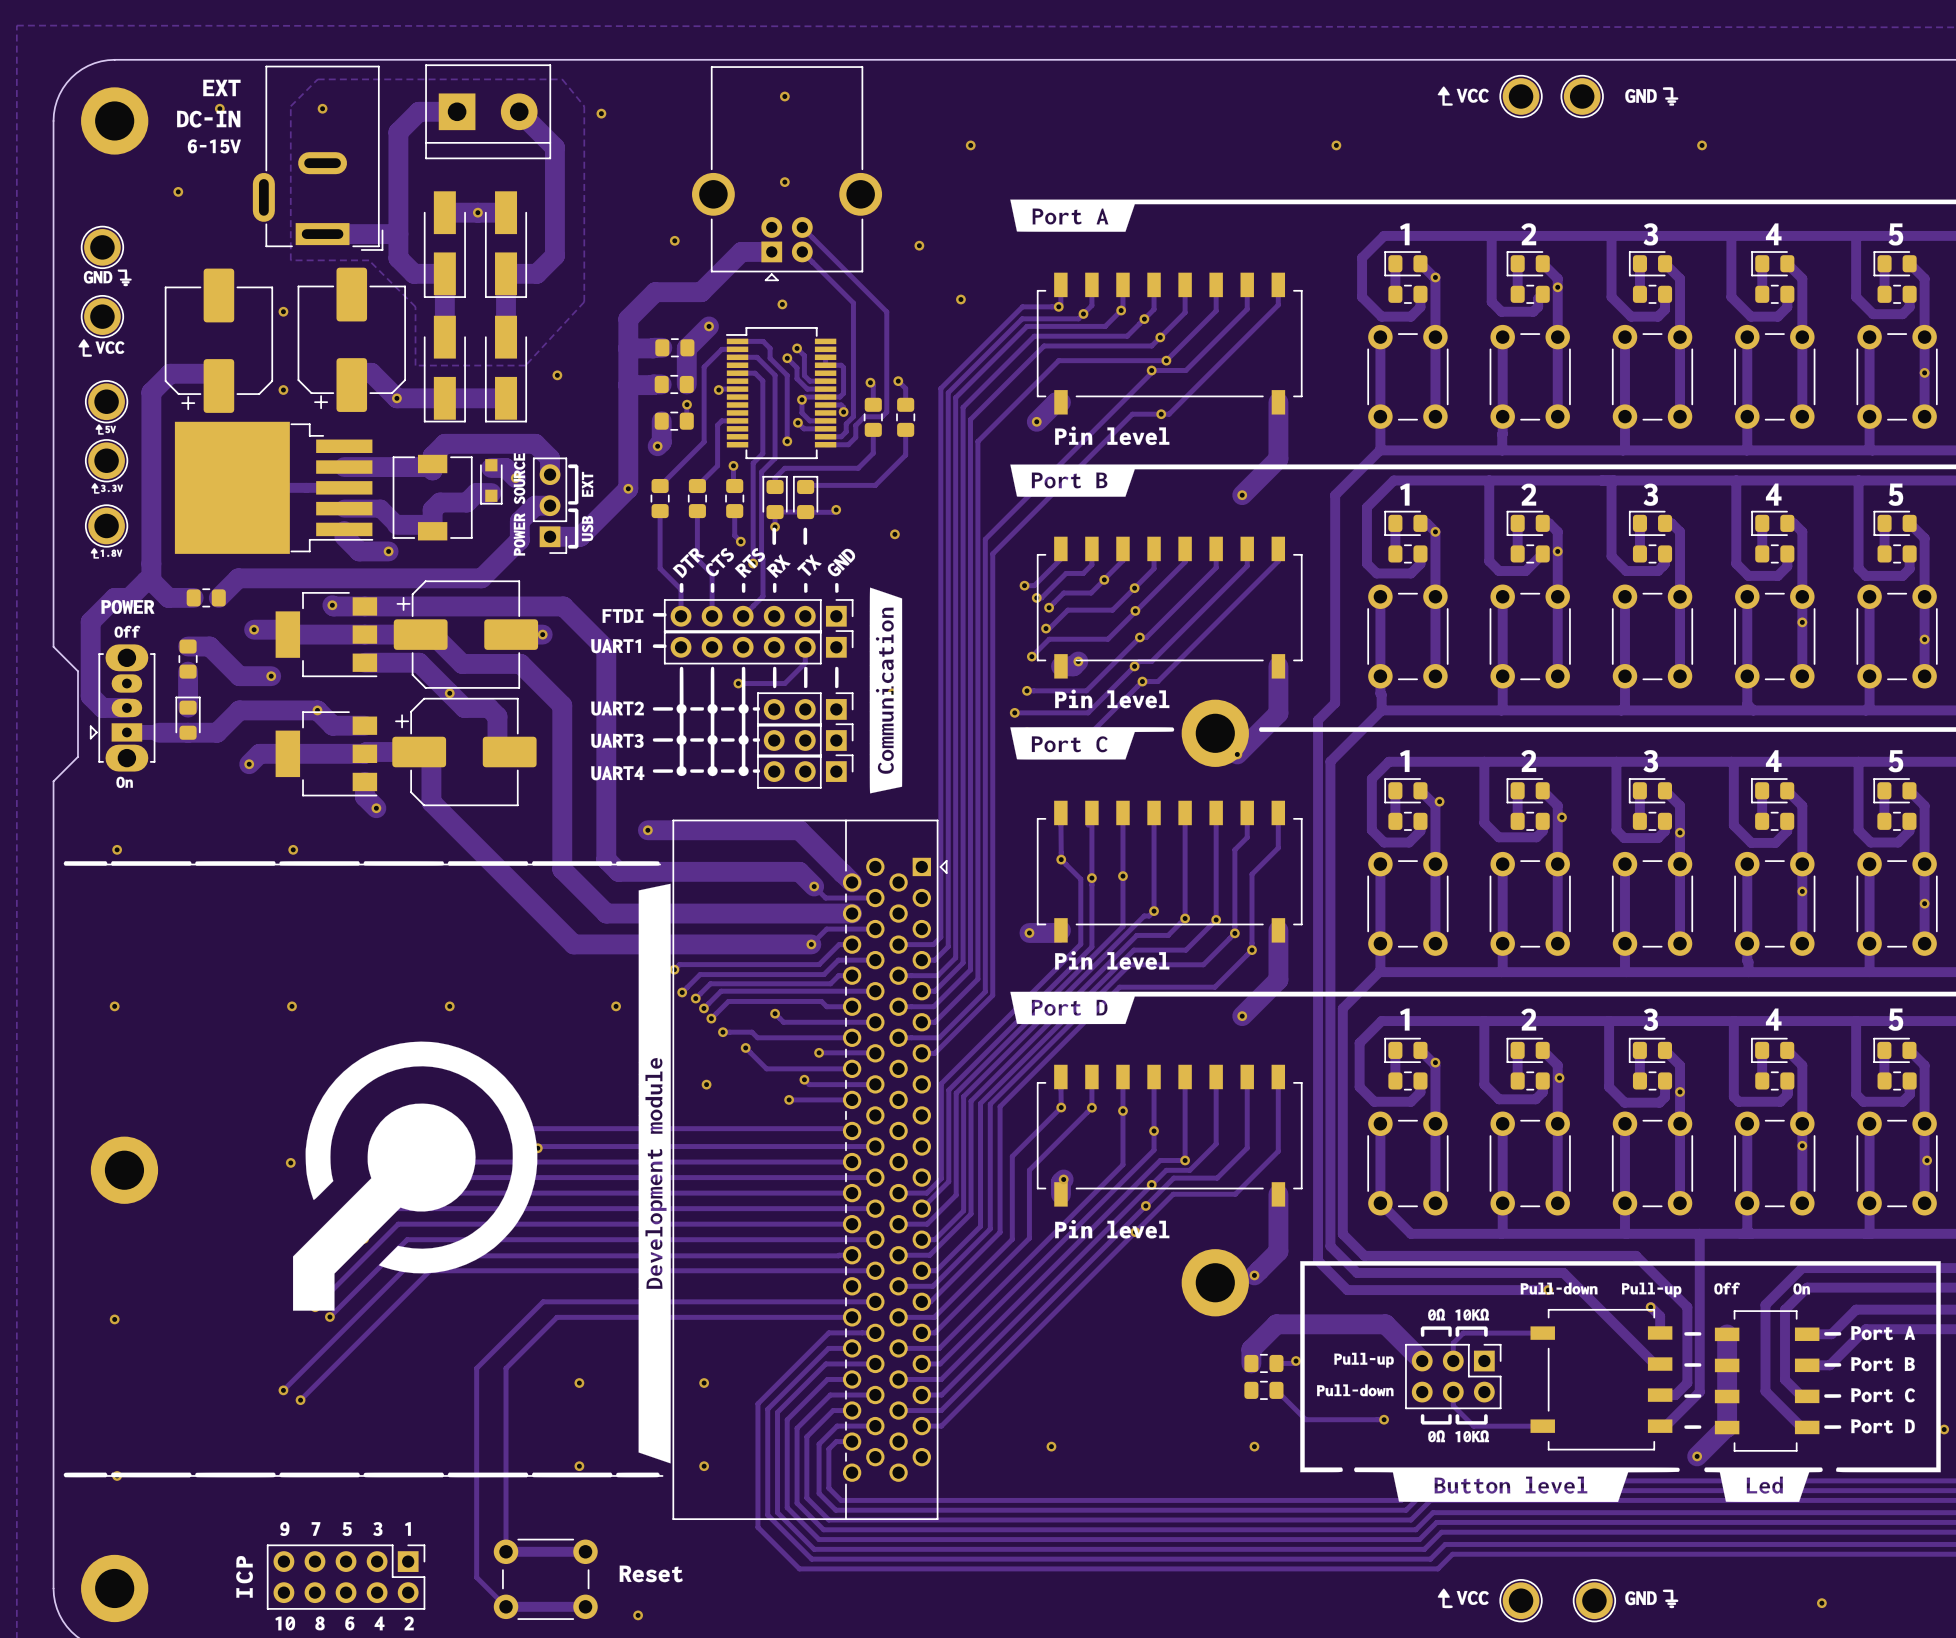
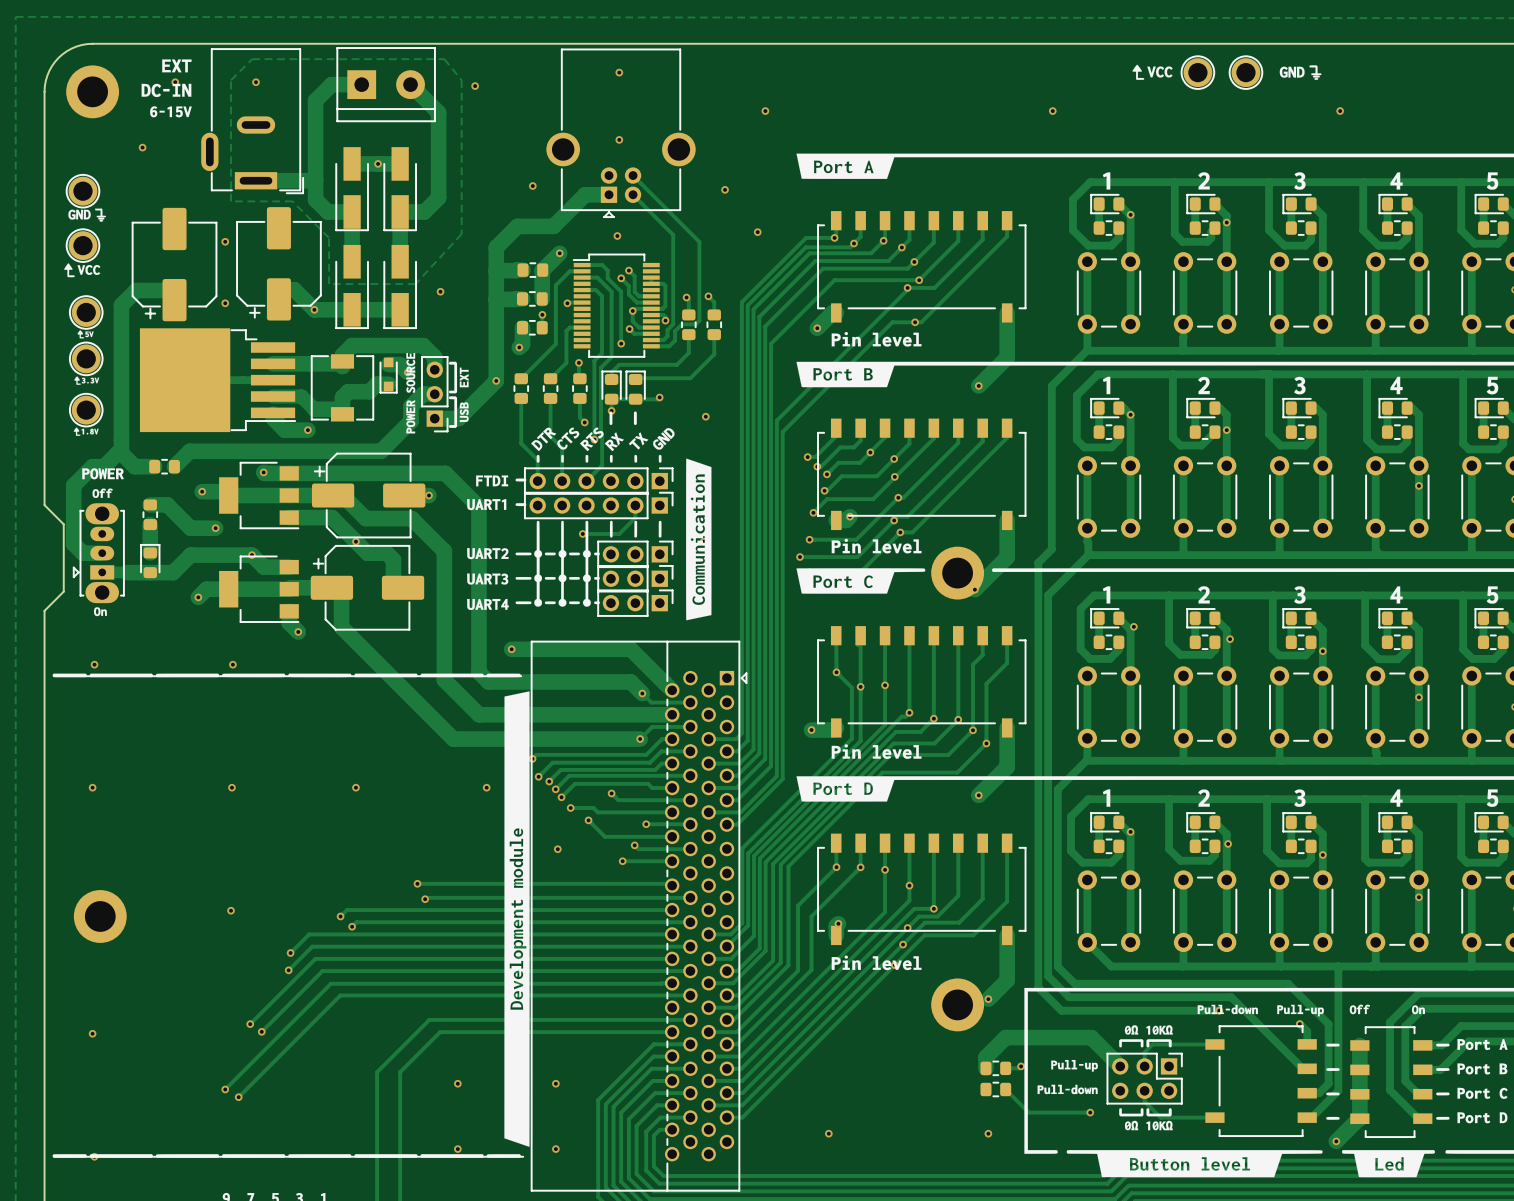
drawing: [292, 1041, 538, 1311] -> none

